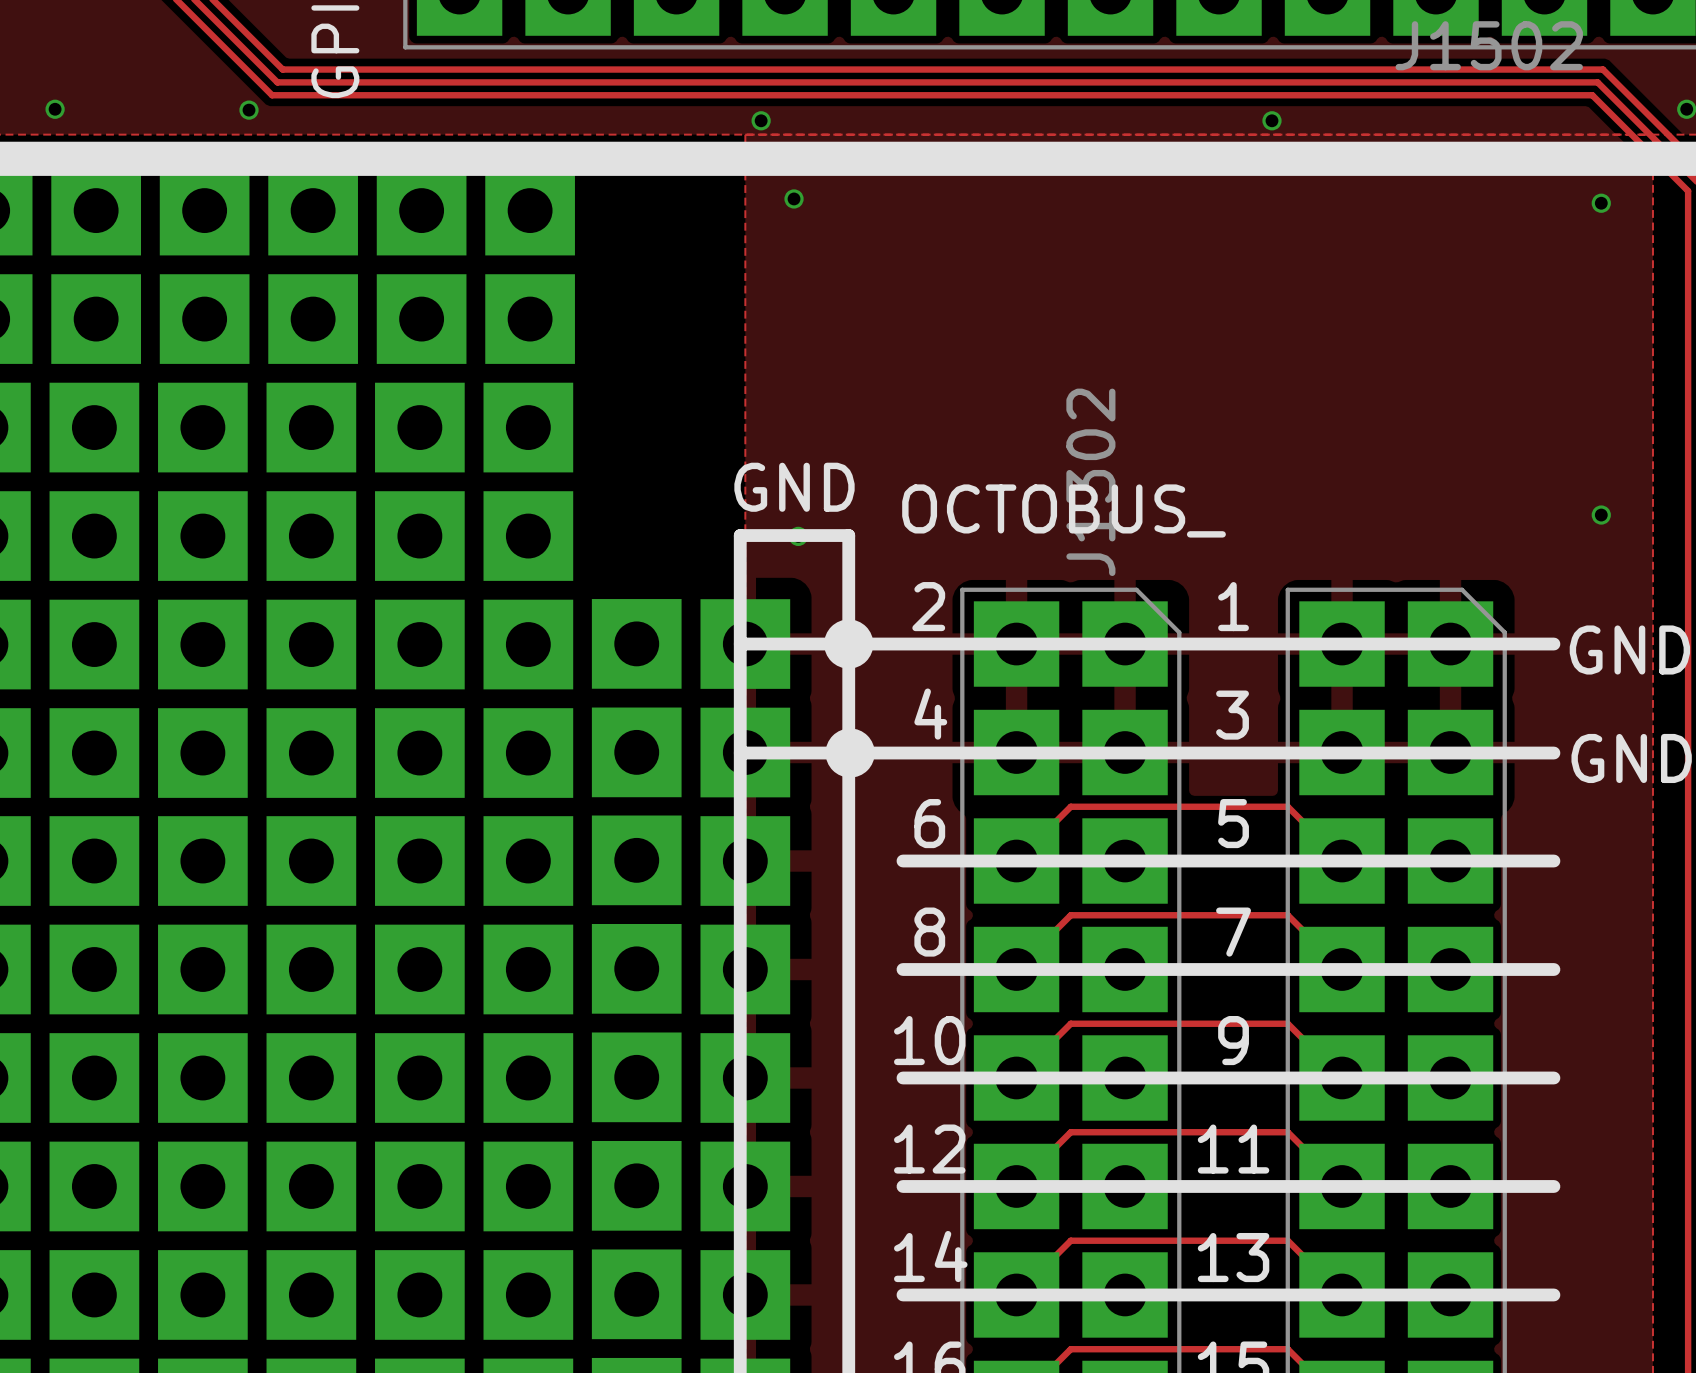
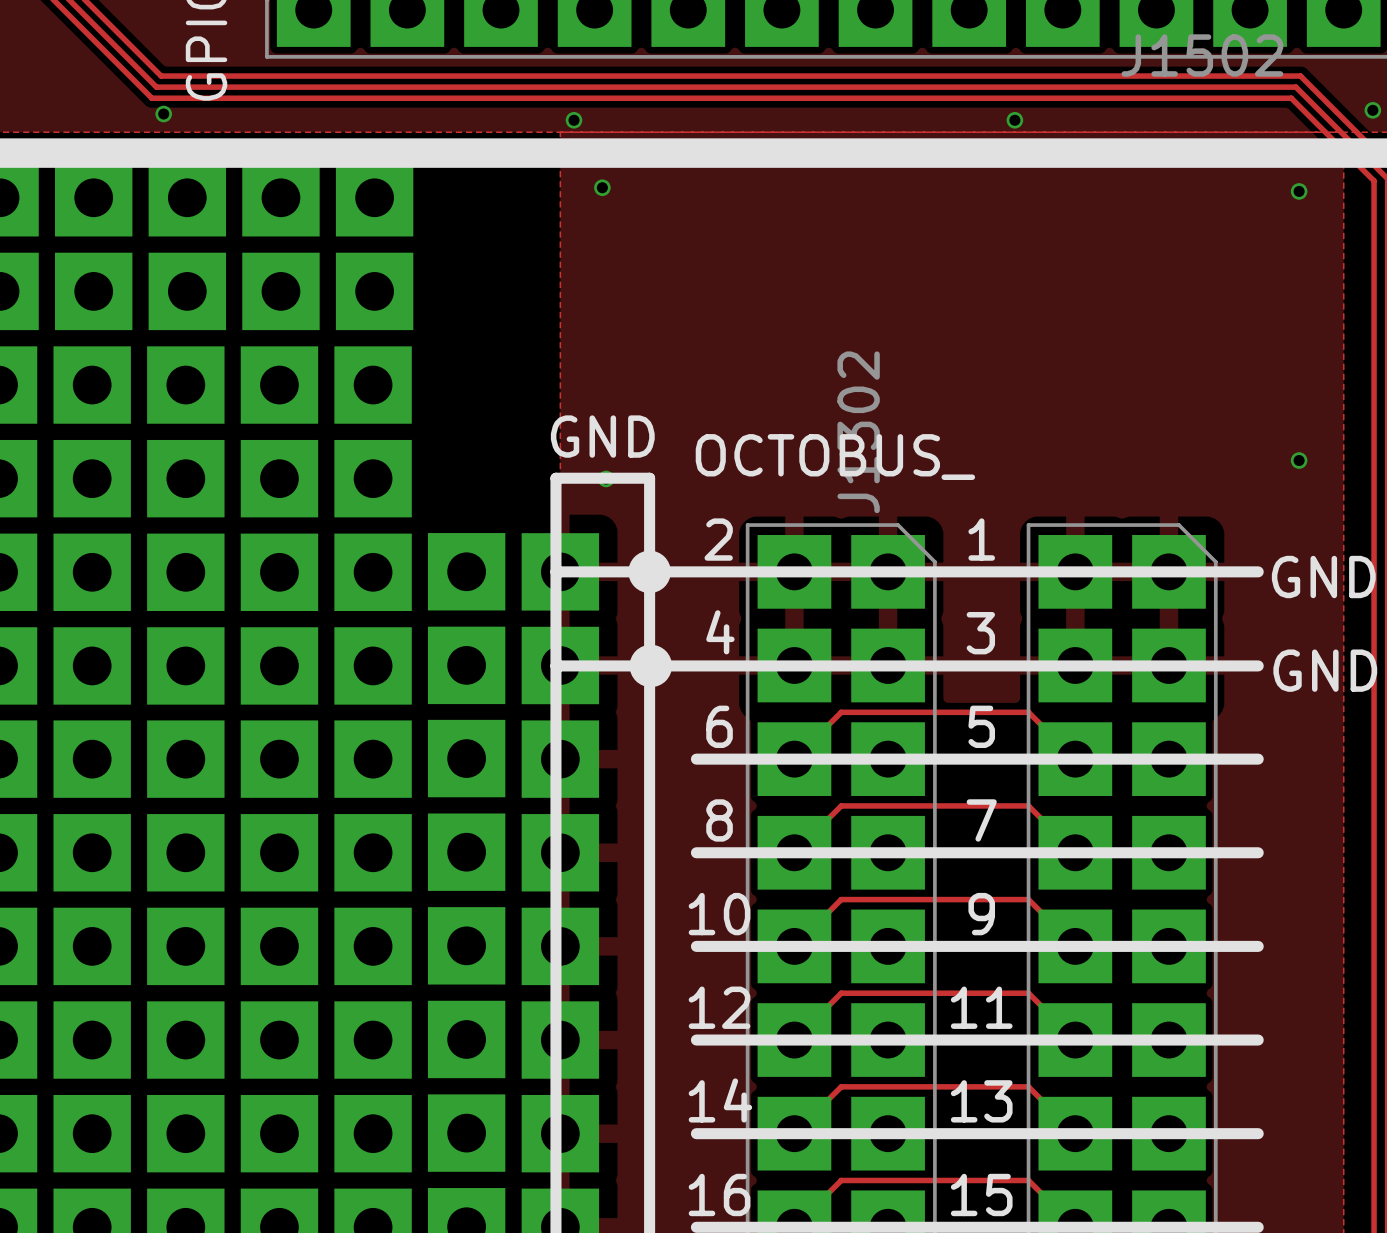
via position: (249, 110) -> (163, 114)

